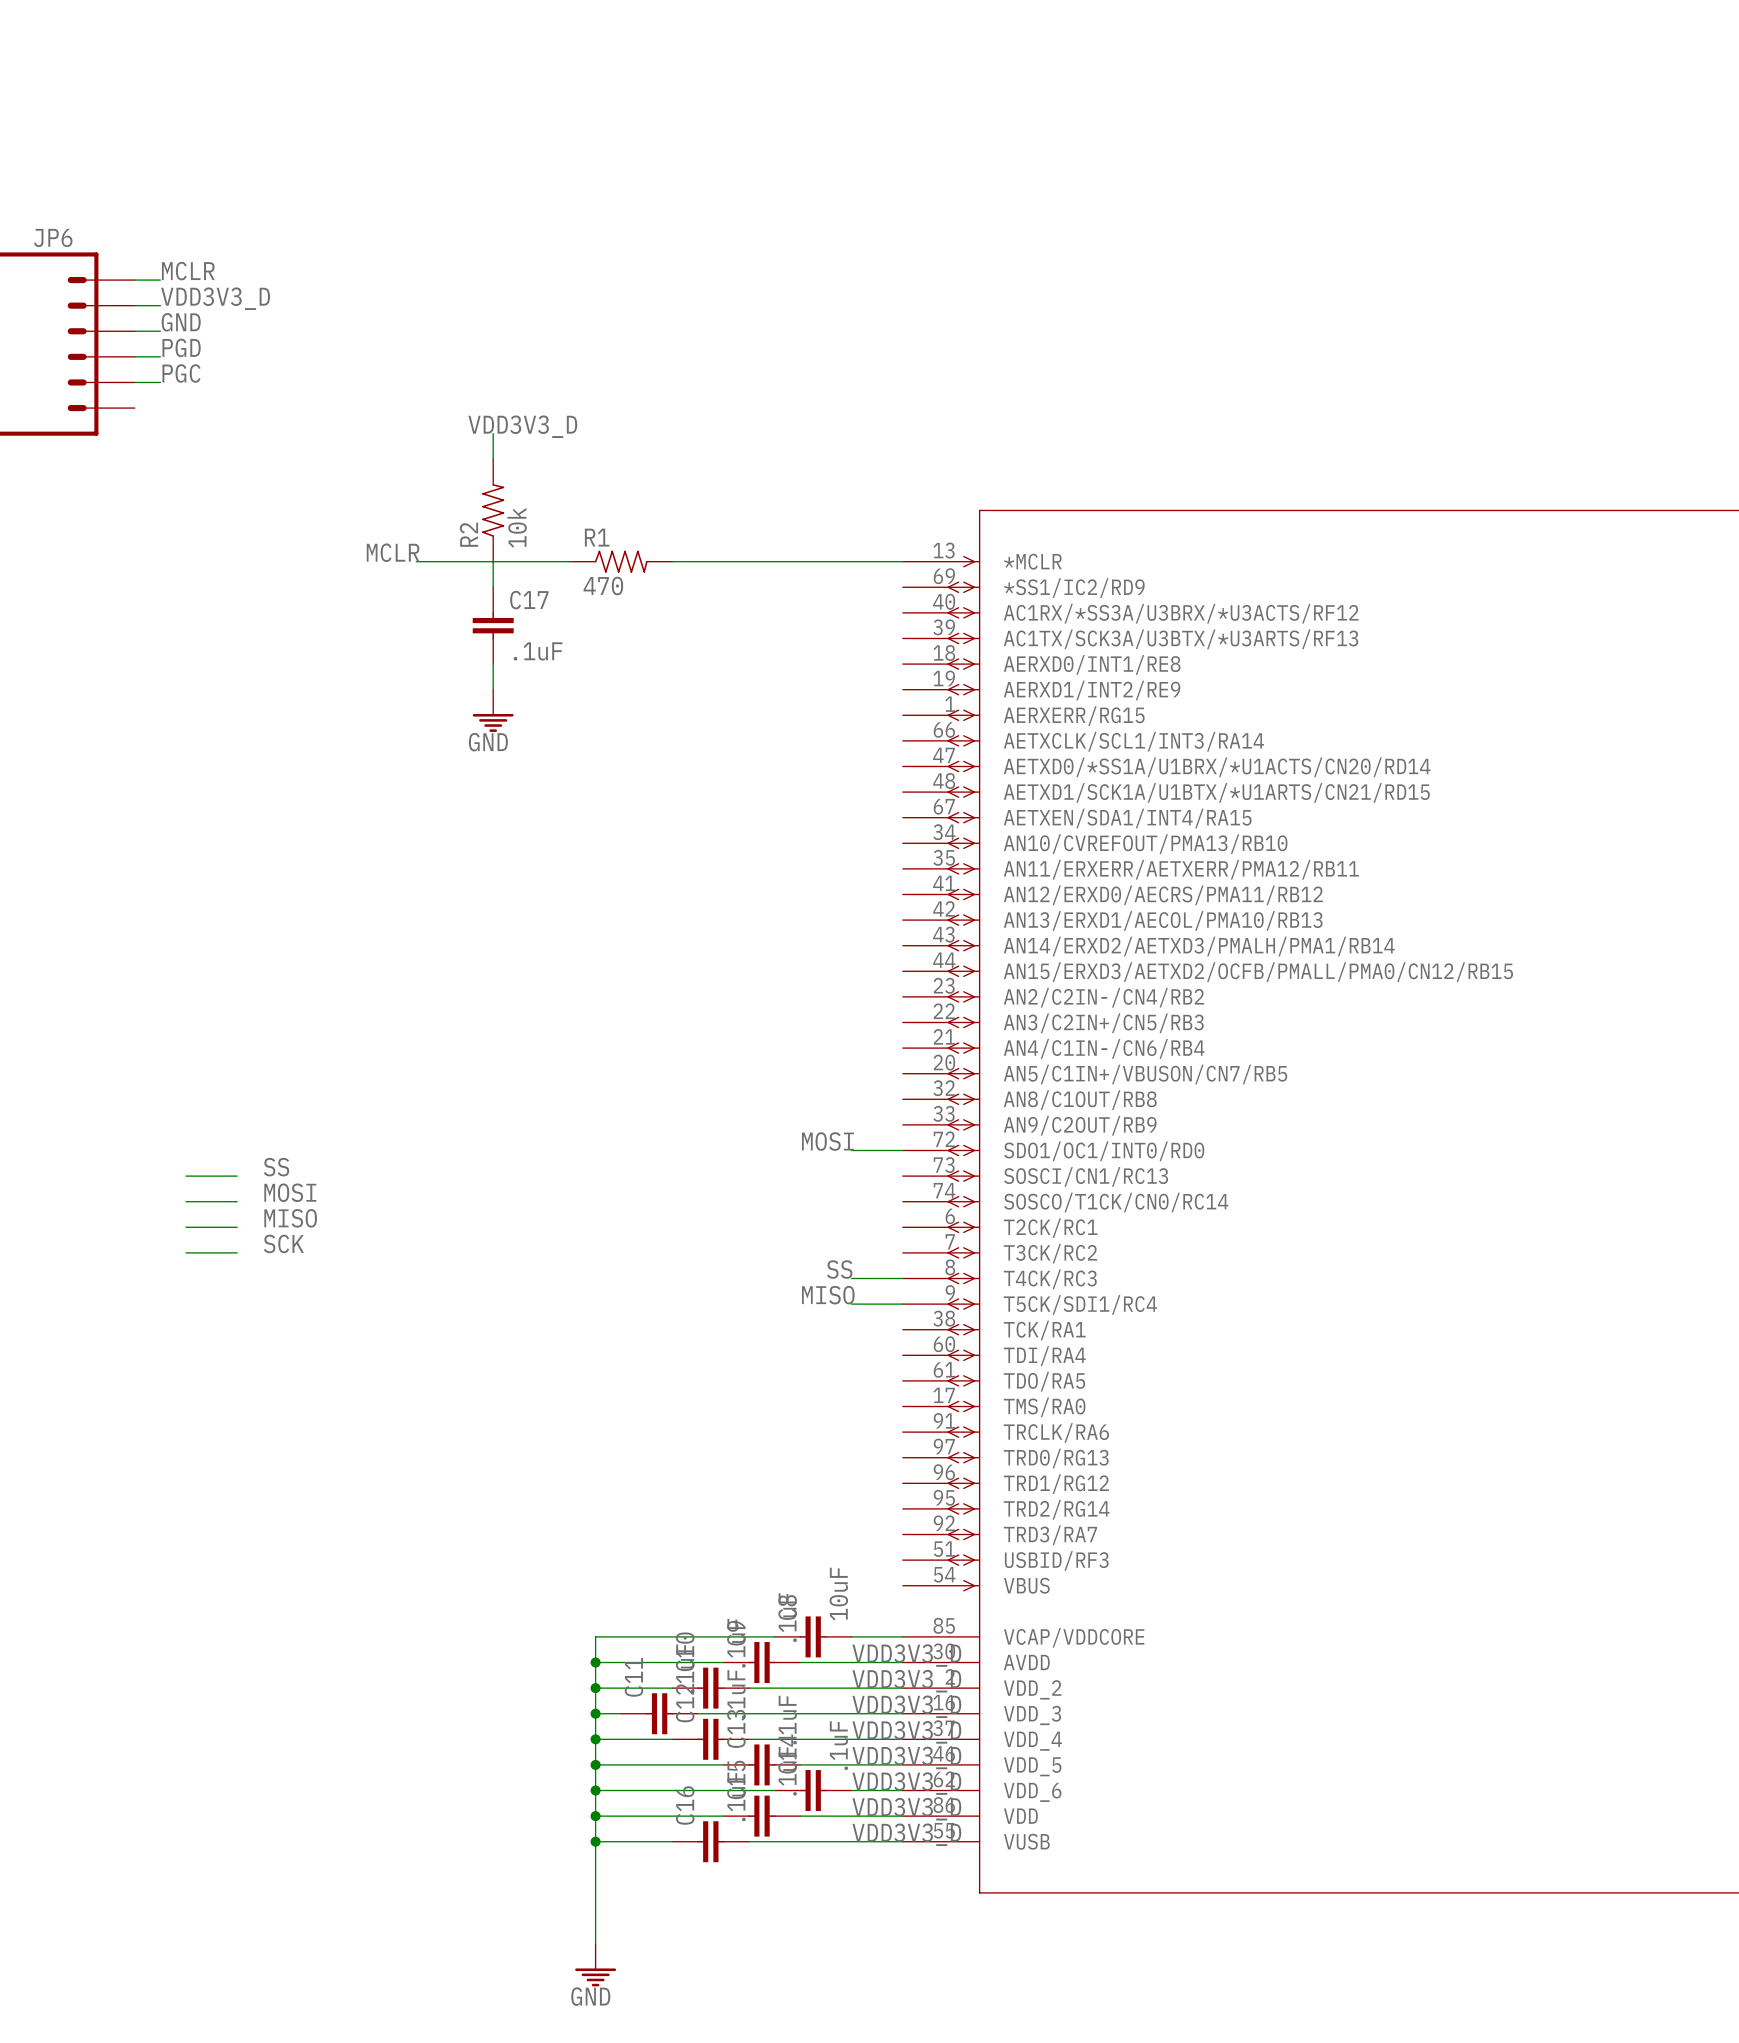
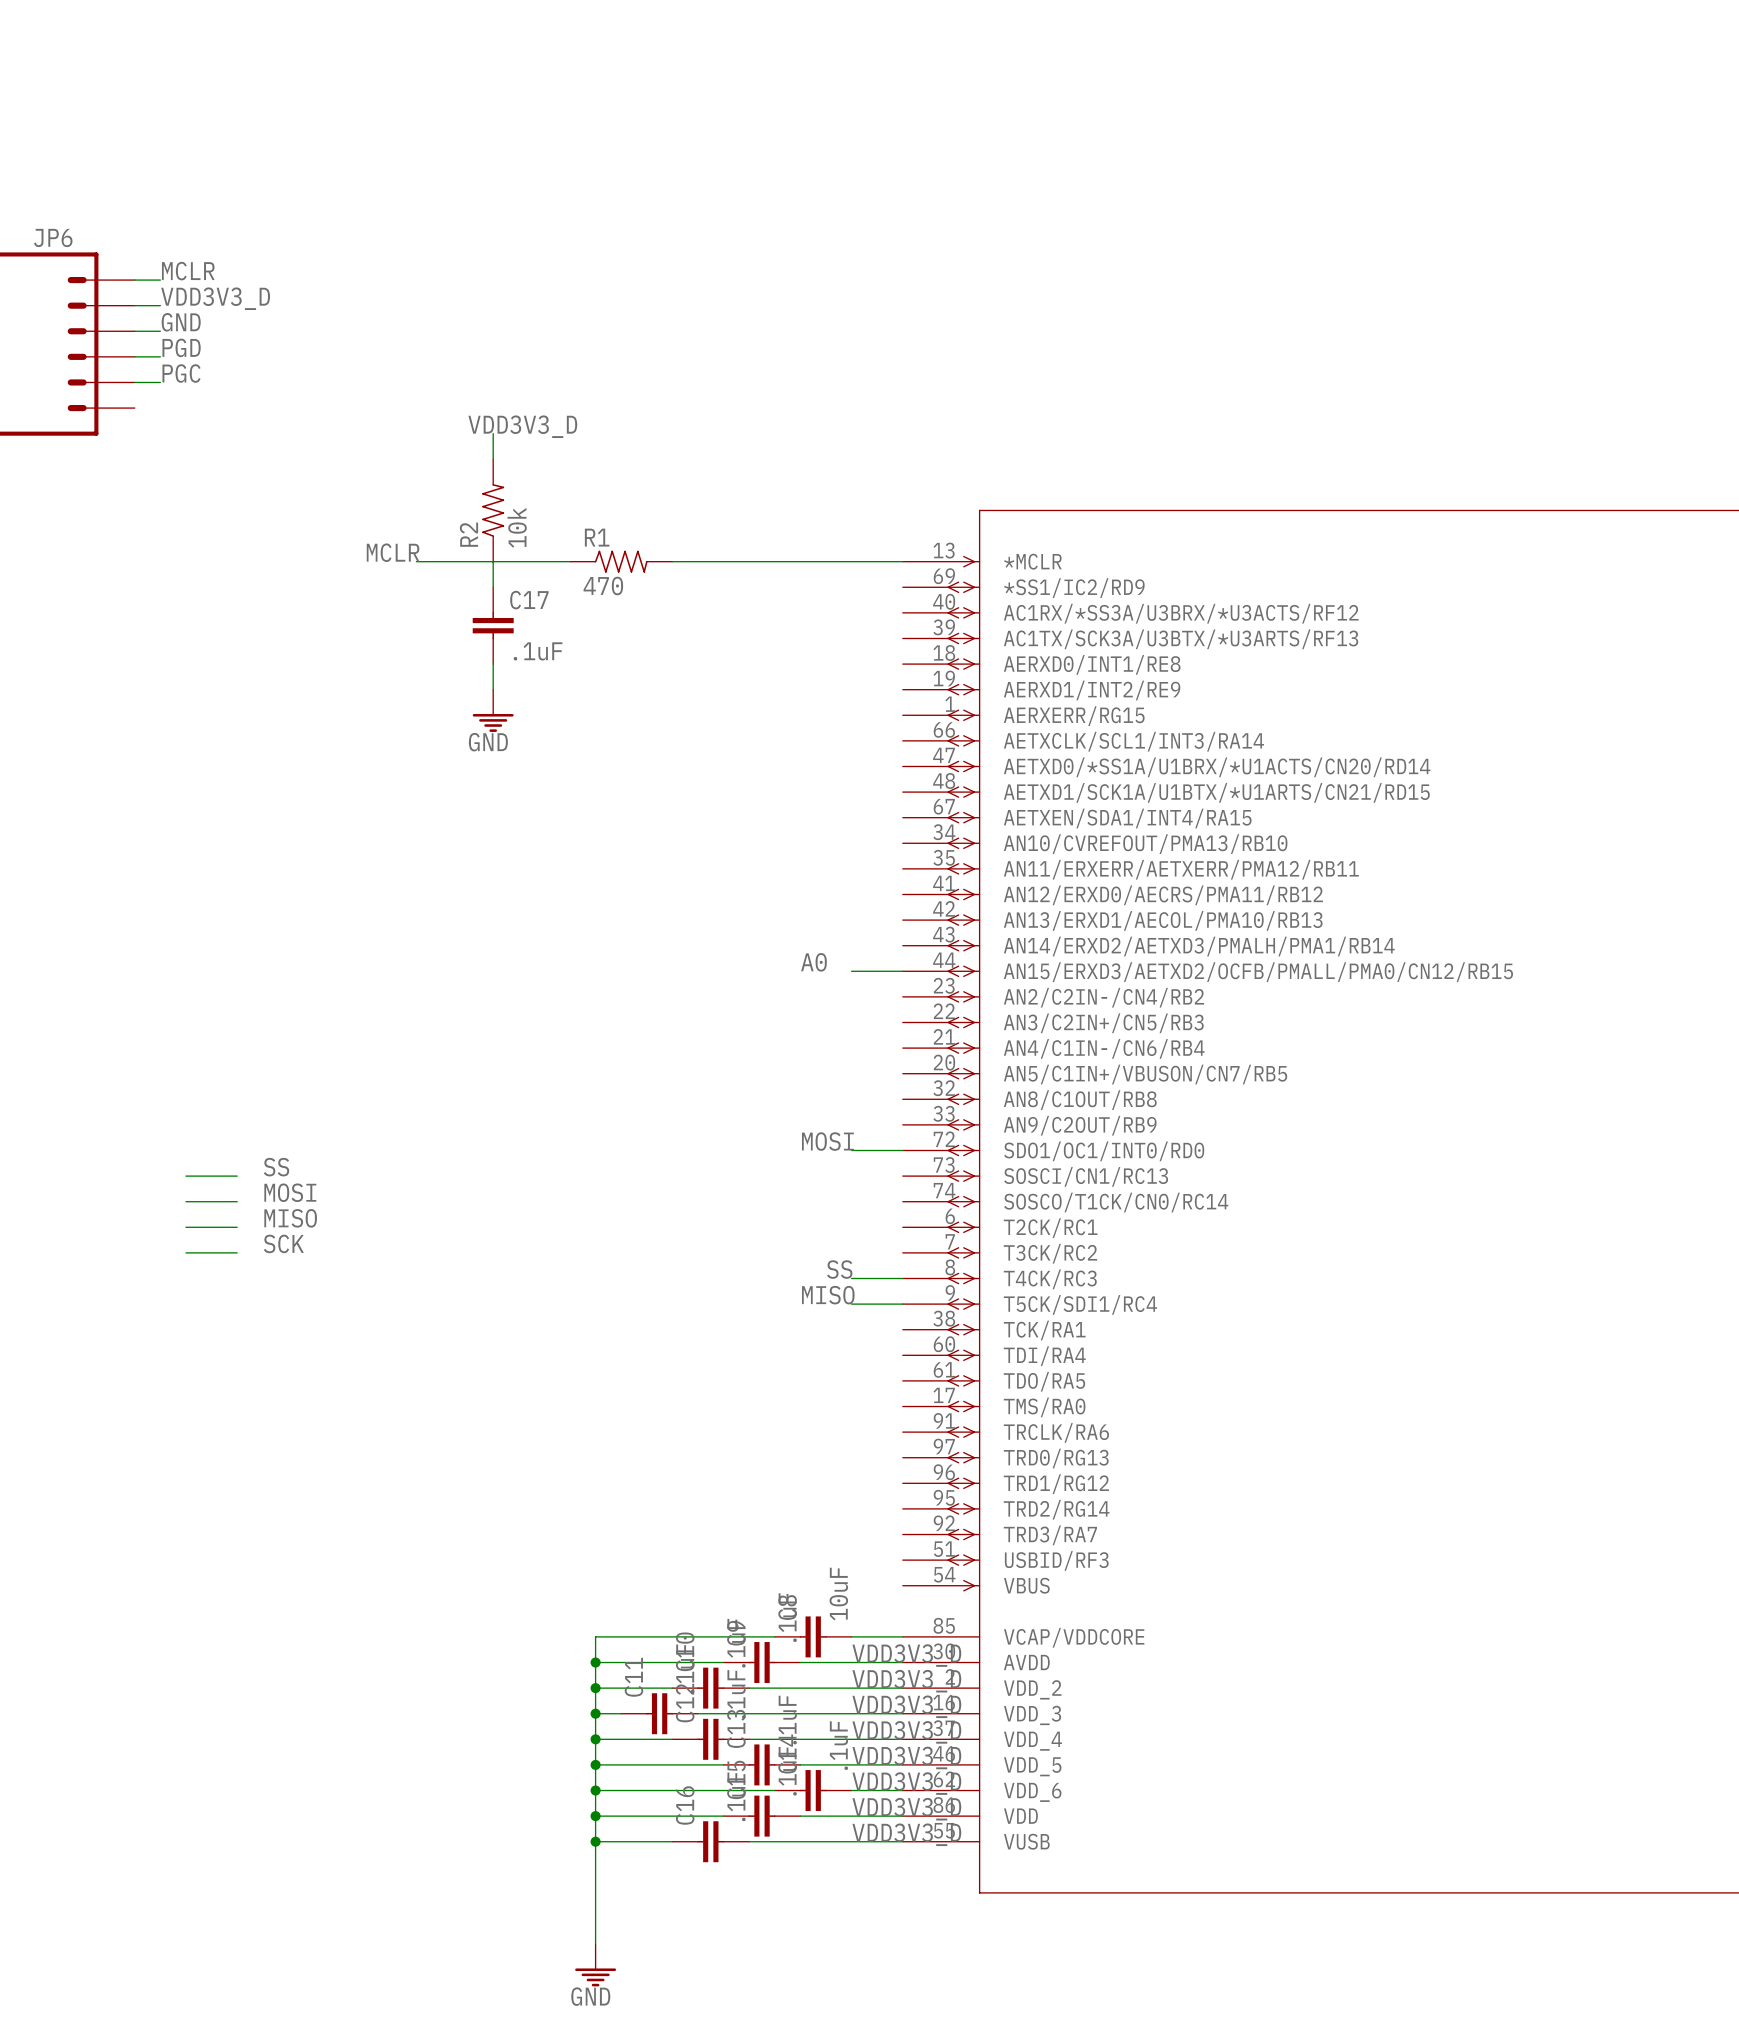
label: none -> A0 (813, 962)
wire: none -> (851, 971) (902, 971)

